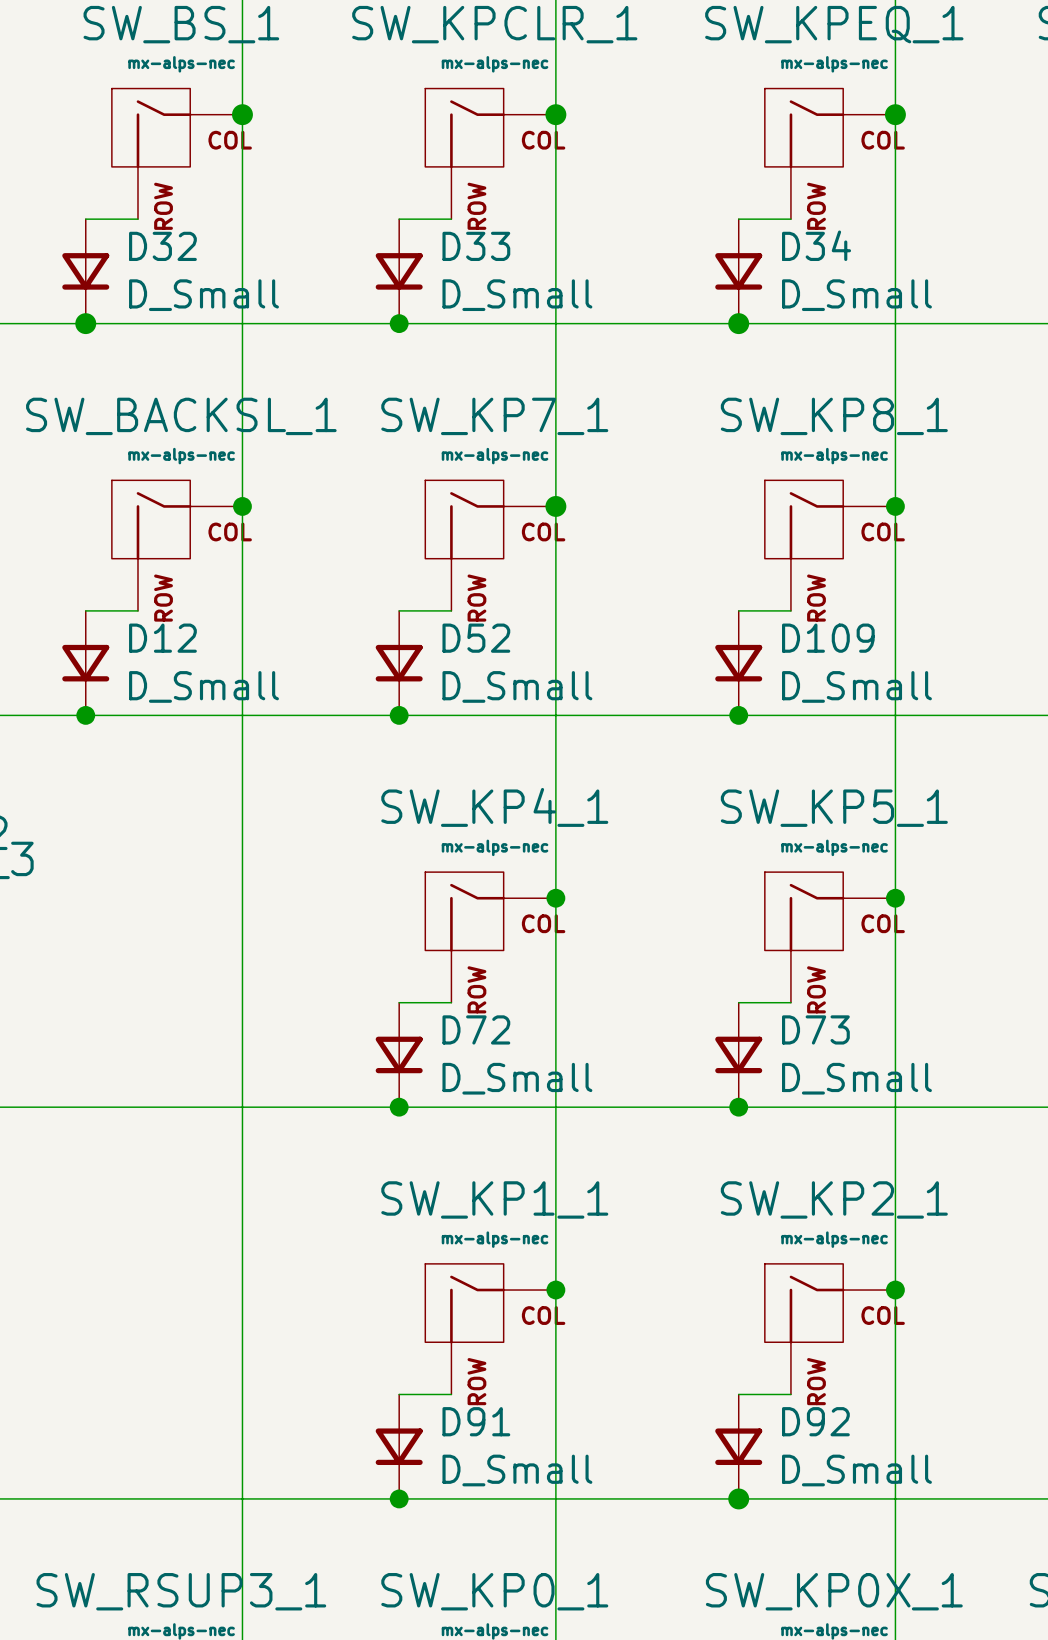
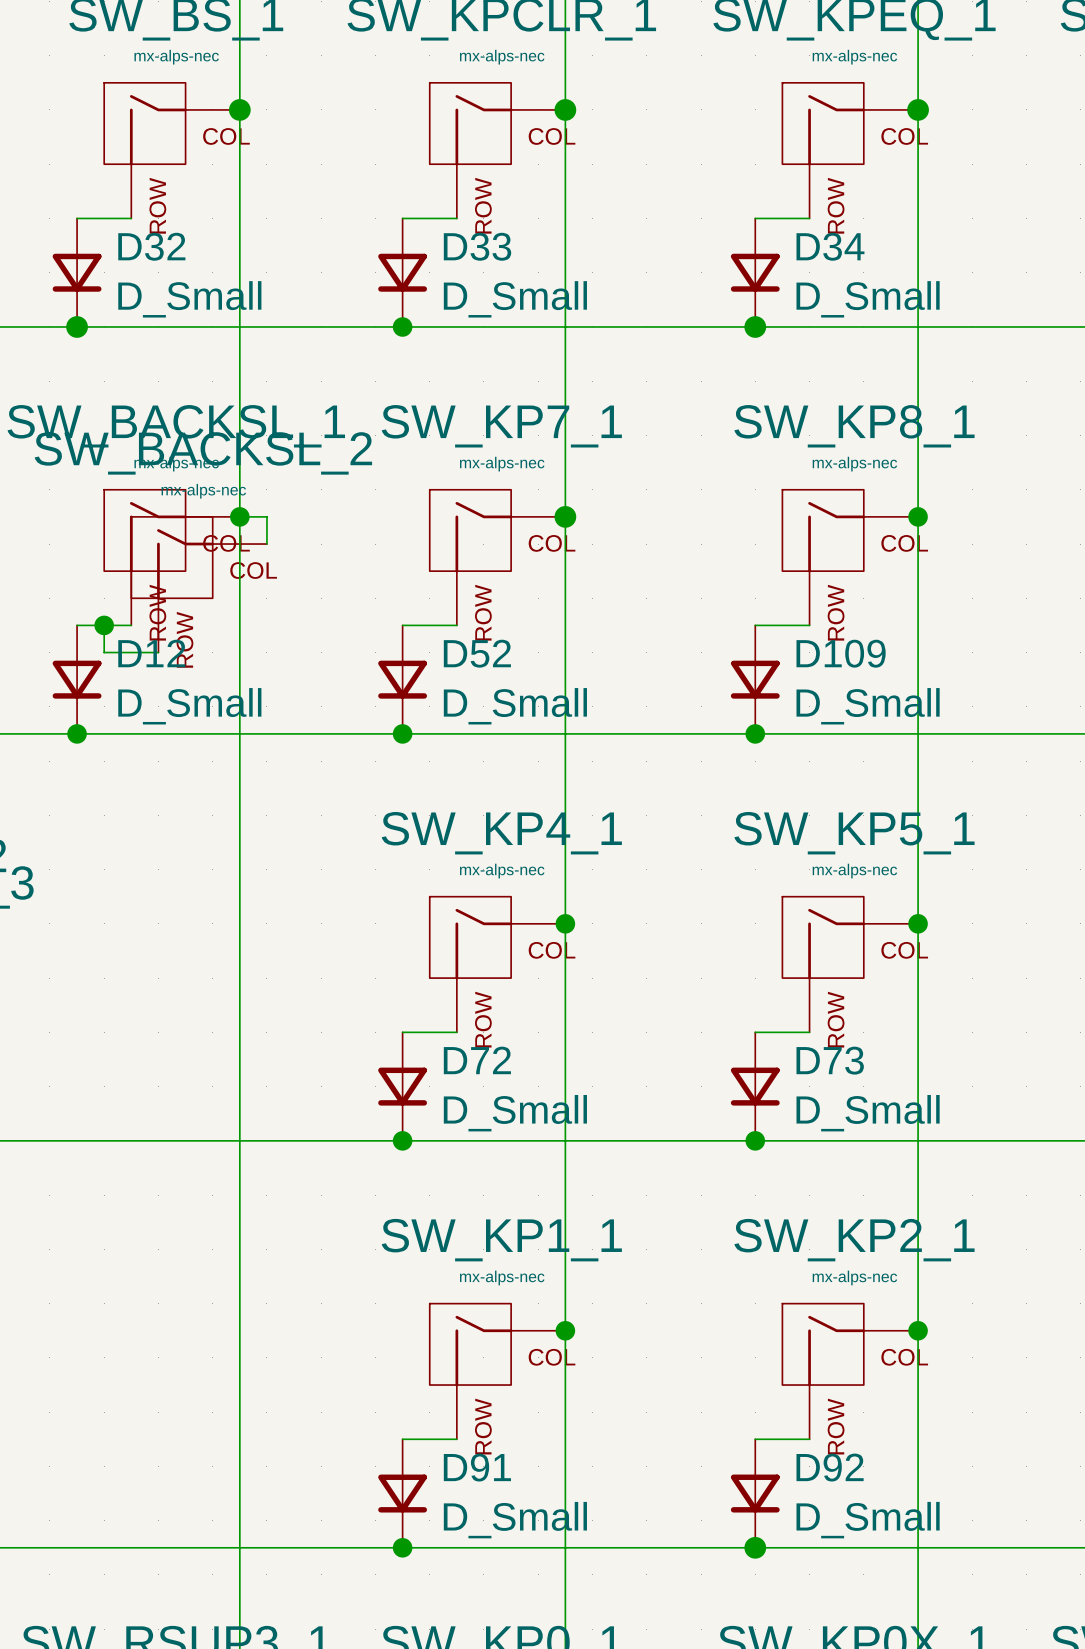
wire: none -> (239, 516) (266, 516) (266, 544)
SW_BACKSL_2: none -> mx-alps-nec (199, 584)
wire: none -> (104, 625) (104, 652) (158, 652)
junction: none -> (104, 625)

